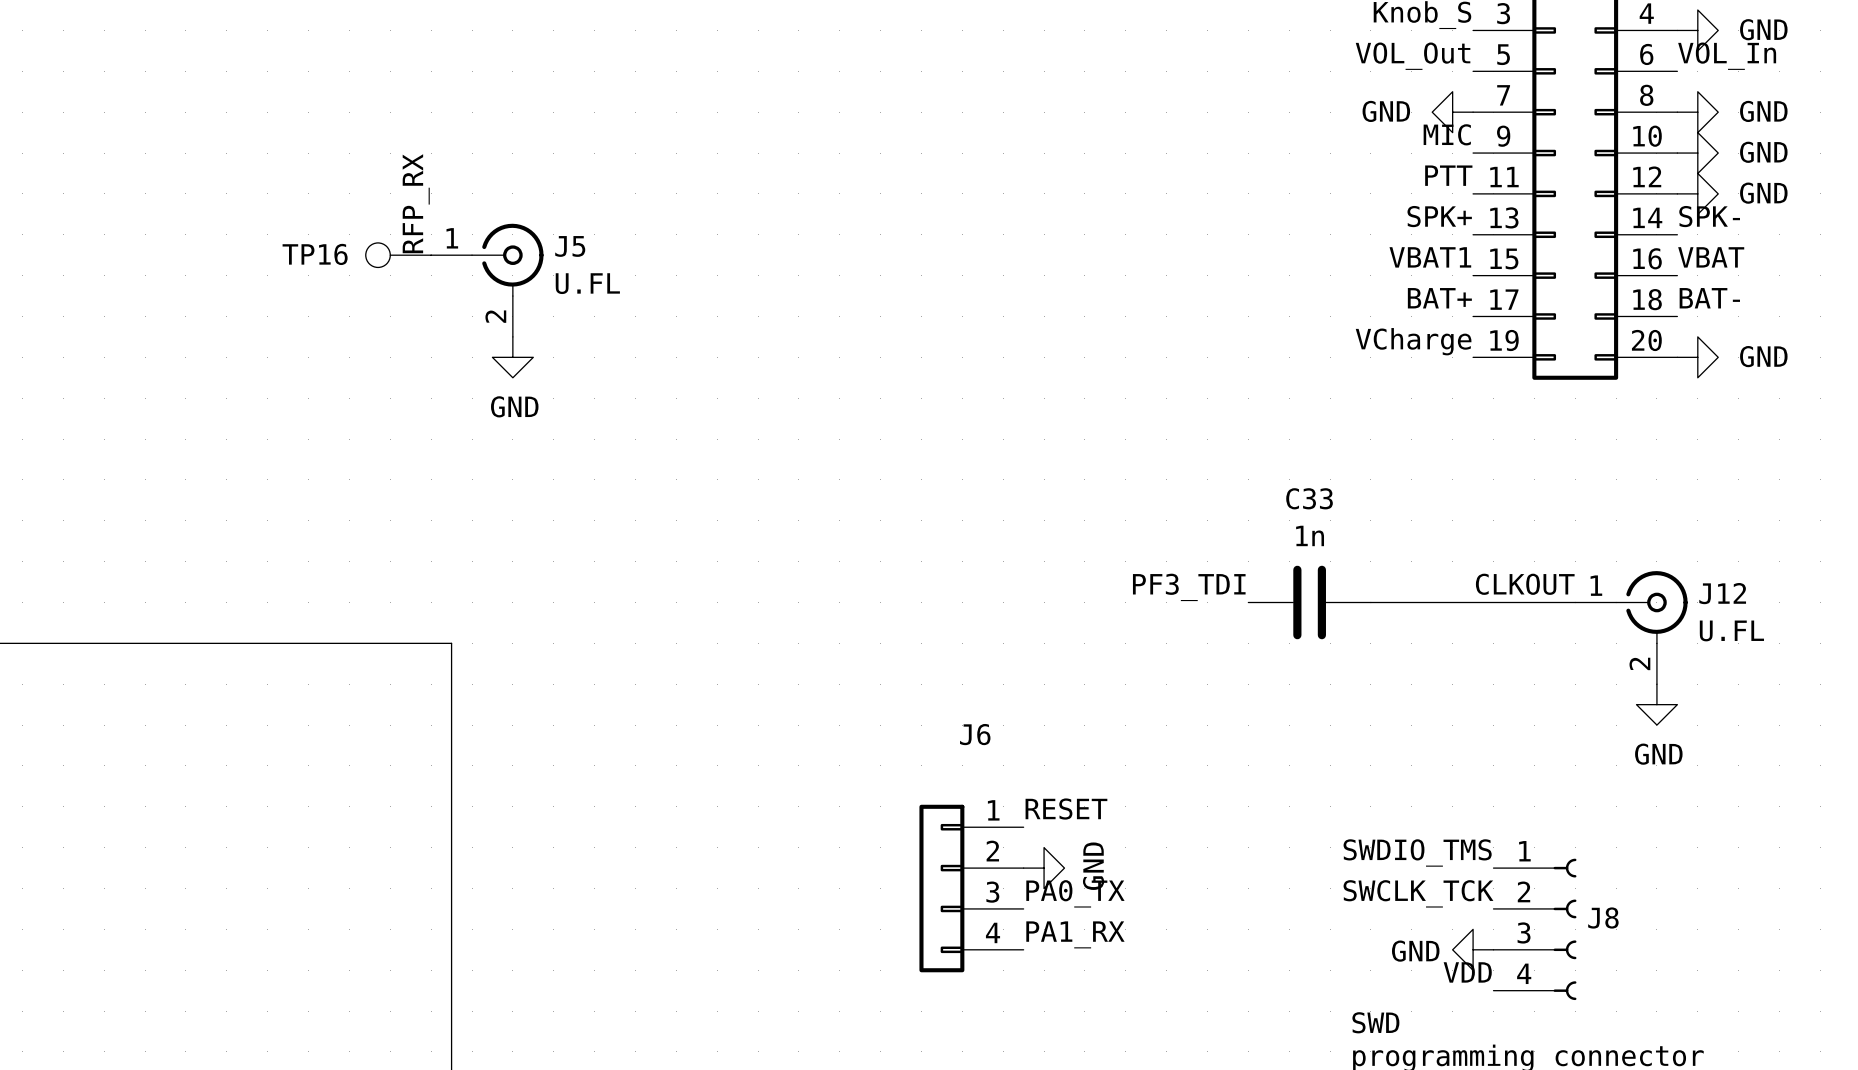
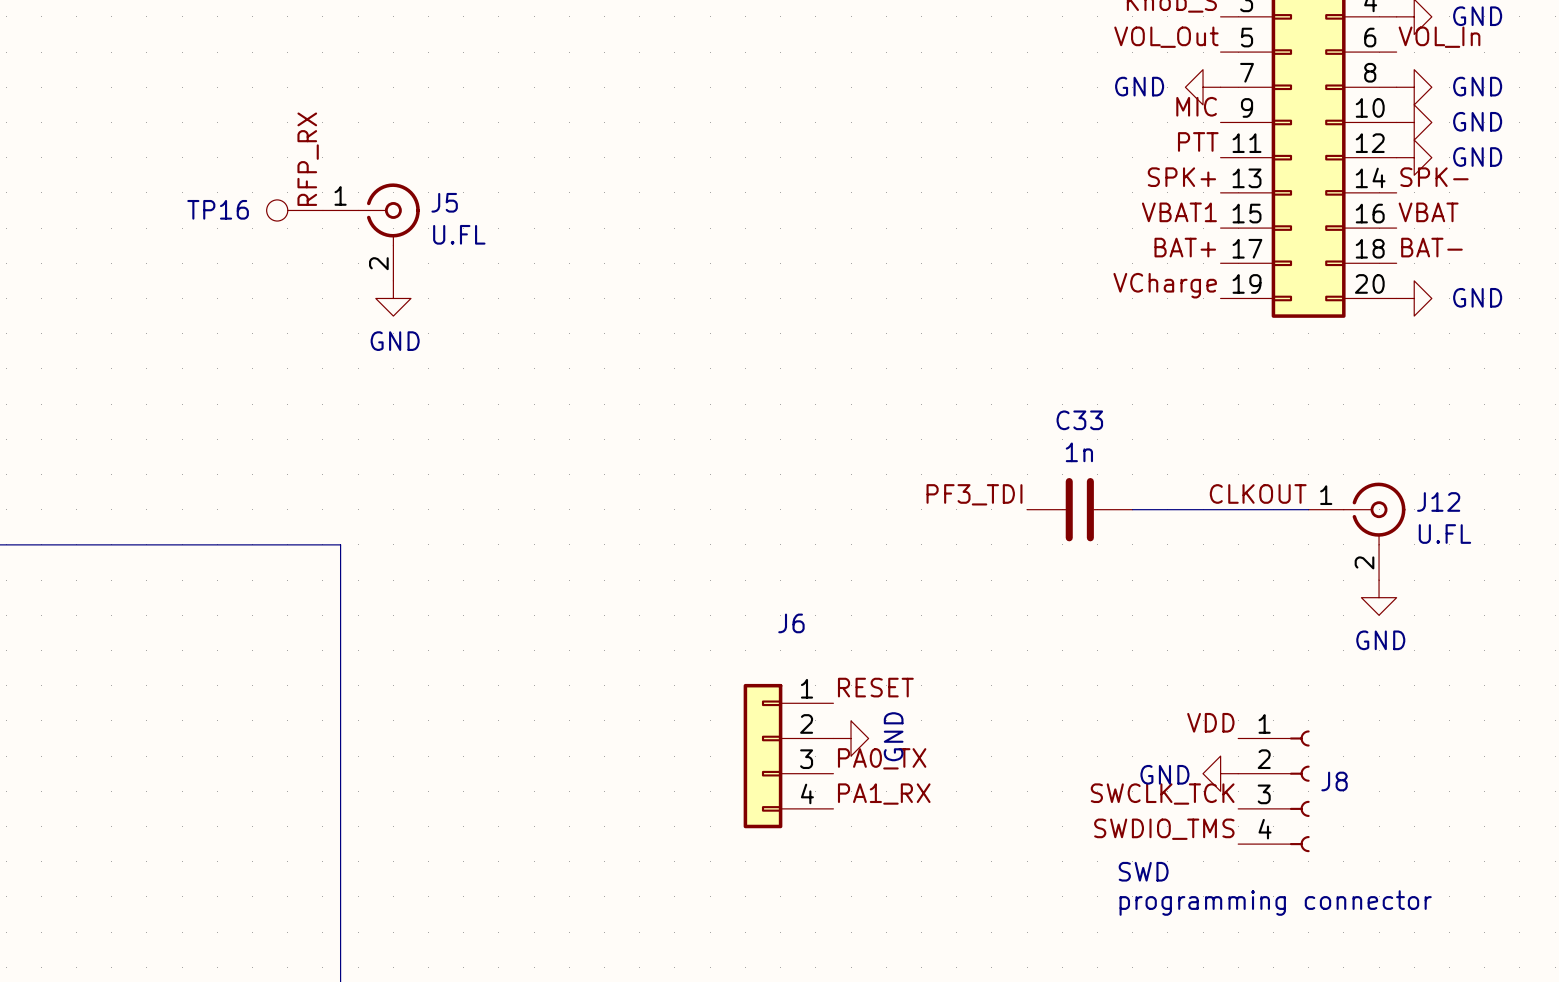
label: SWDIO_TMS (1417, 852) -> VDD (1210, 722)
label position: SWCLK_TCK (1418, 893) -> SWCLK_TCK (1162, 794)
power symbol position: GND (1473, 949) -> GND (1220, 773)
label: VDD (1467, 972) -> SWDIO_TMS (1164, 829)

